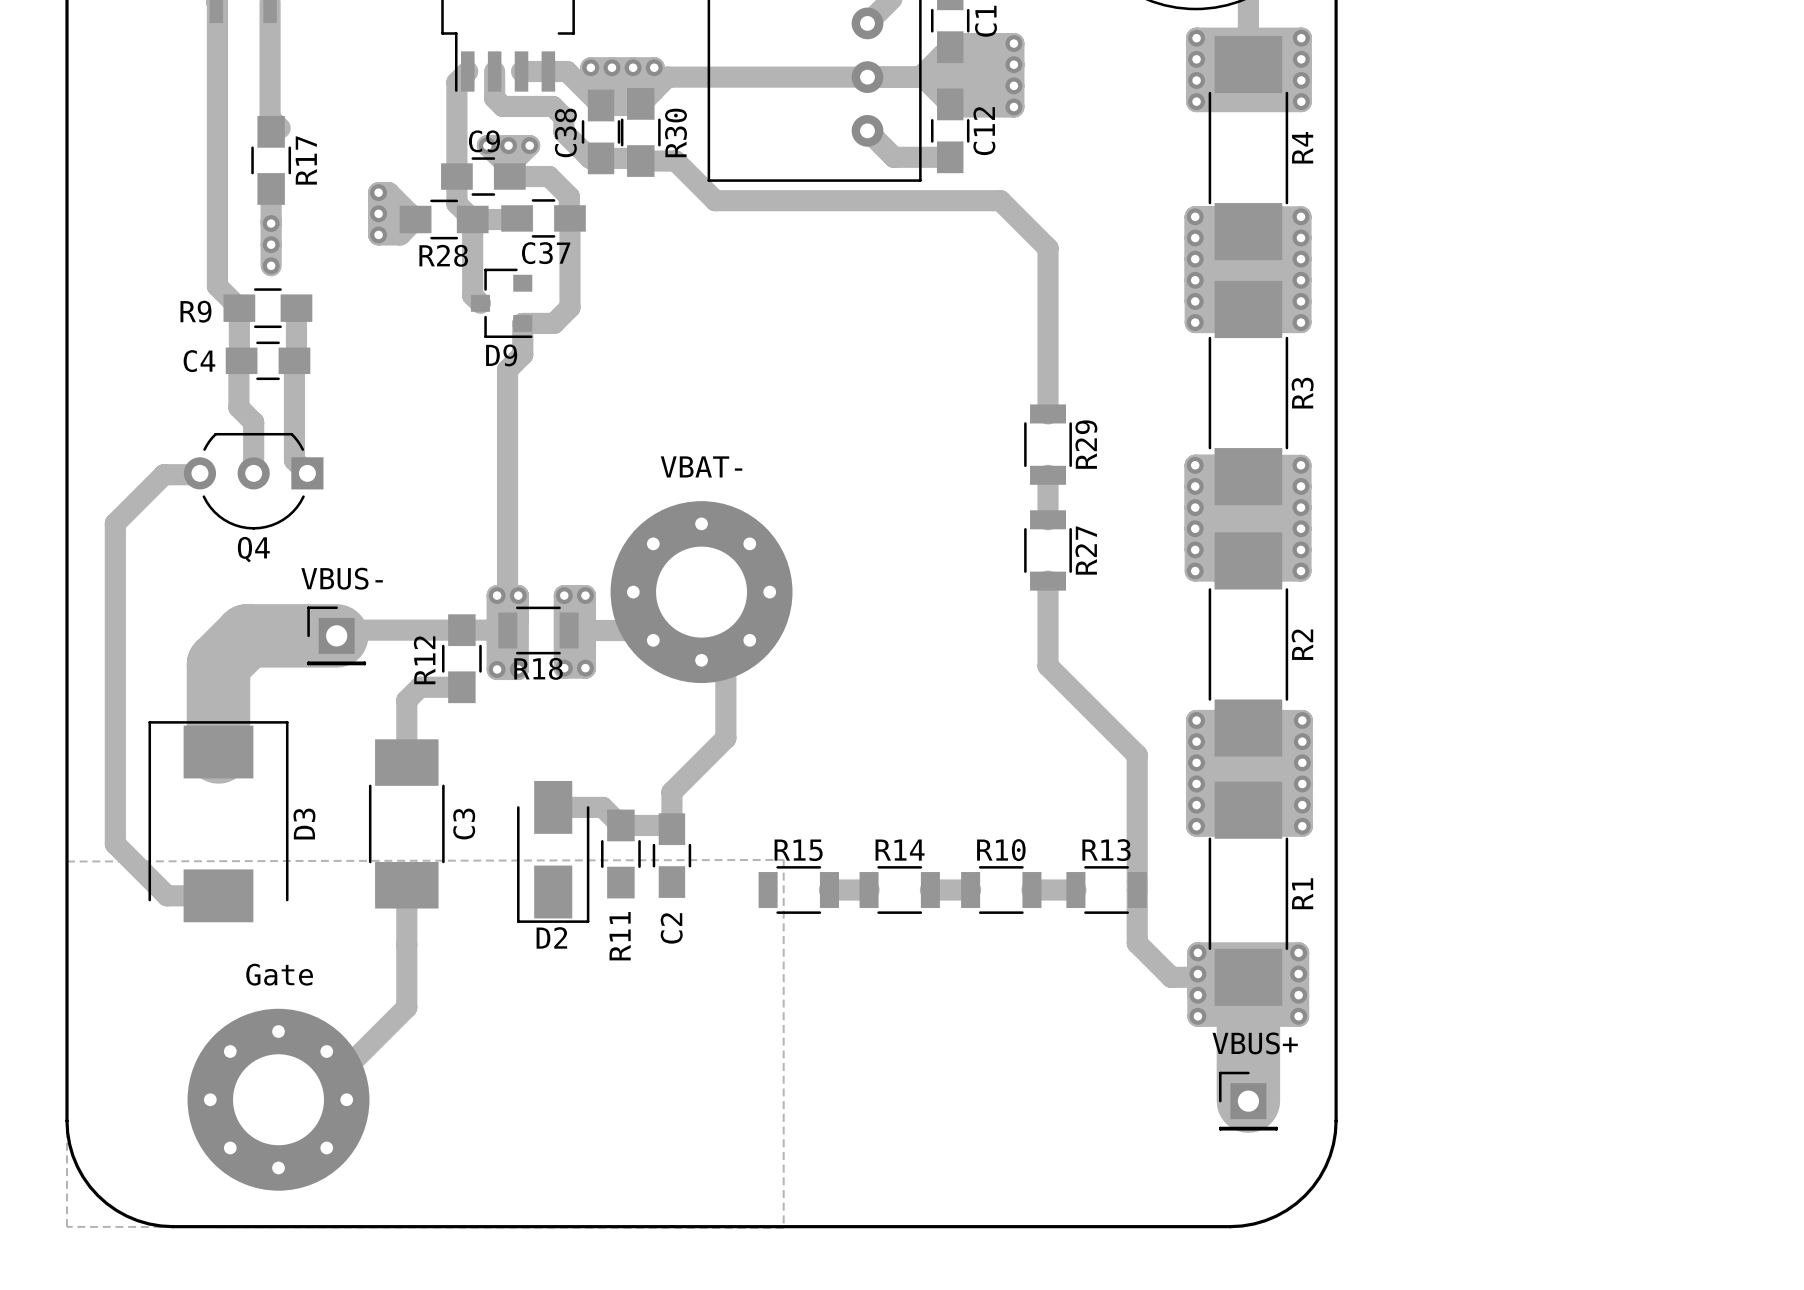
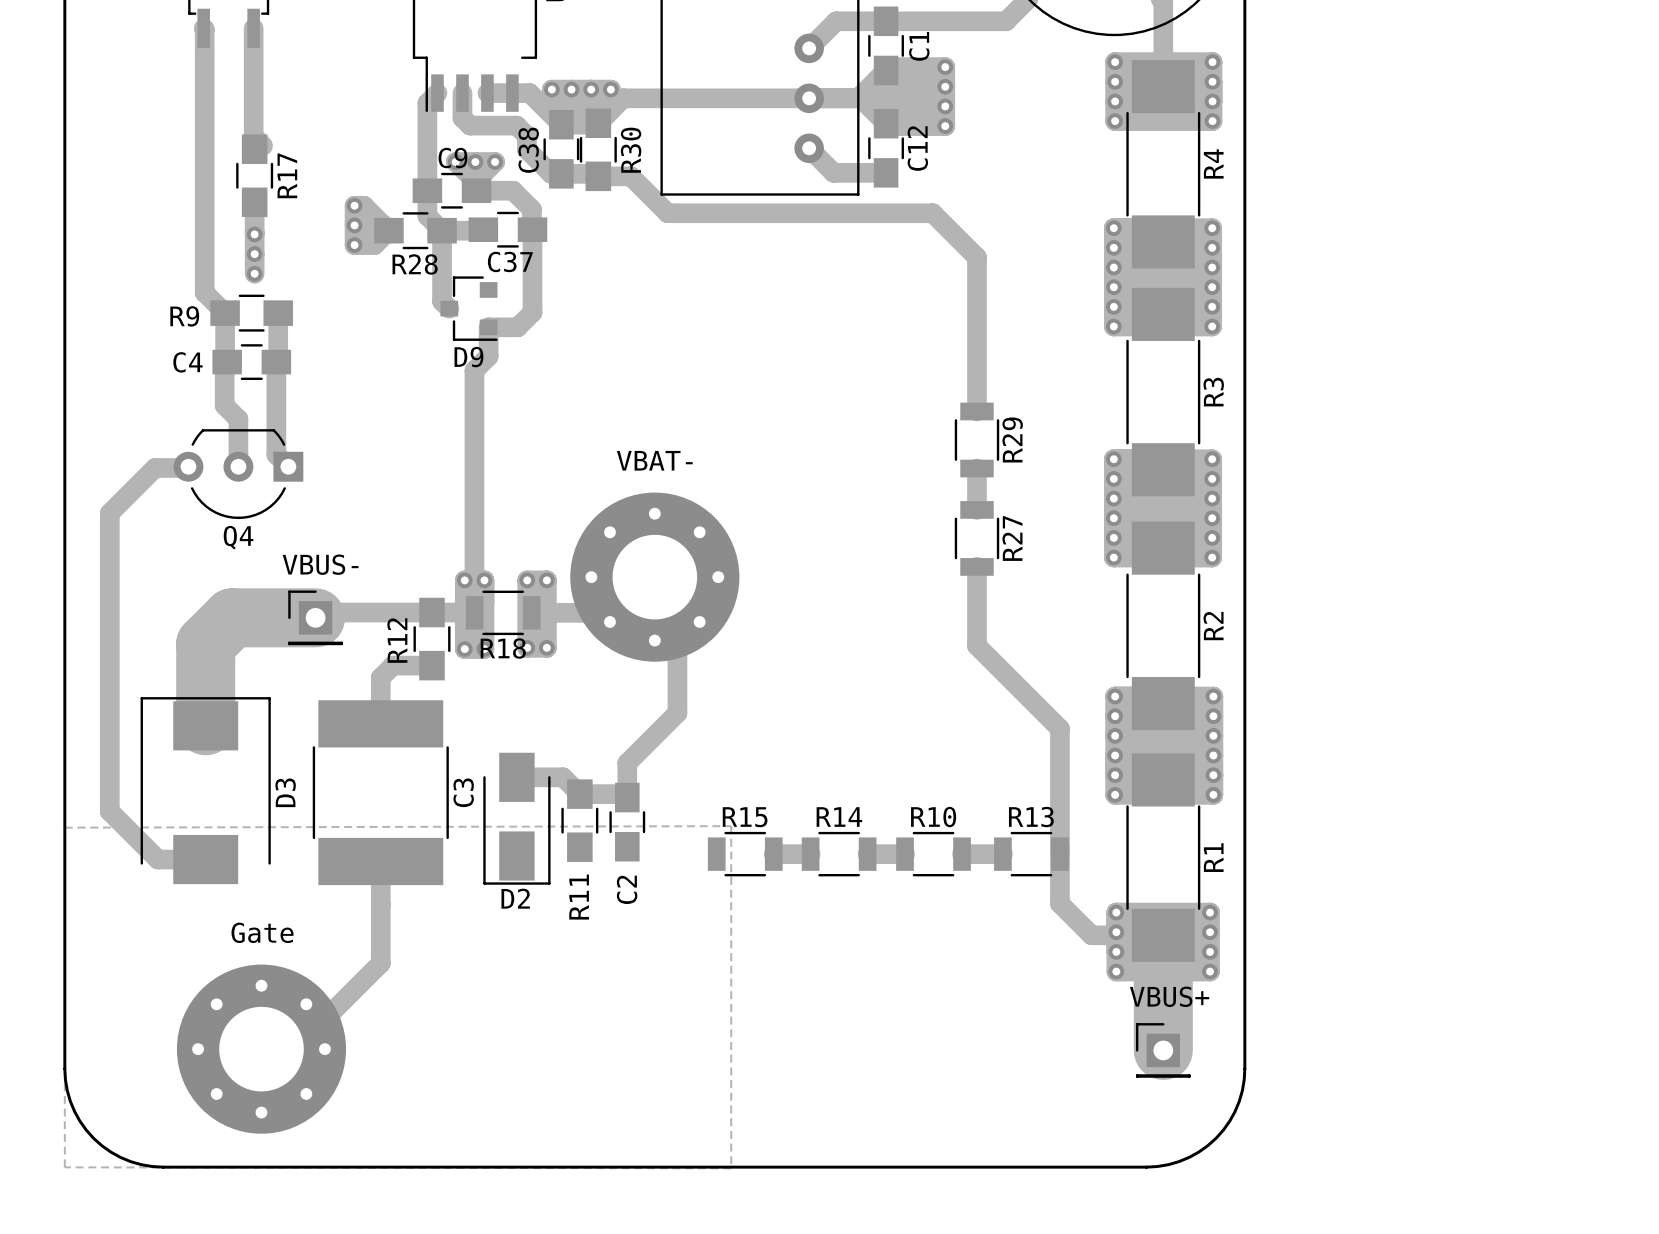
C3 footprint: [368, 739, 445, 909] -> [312, 700, 449, 886]

